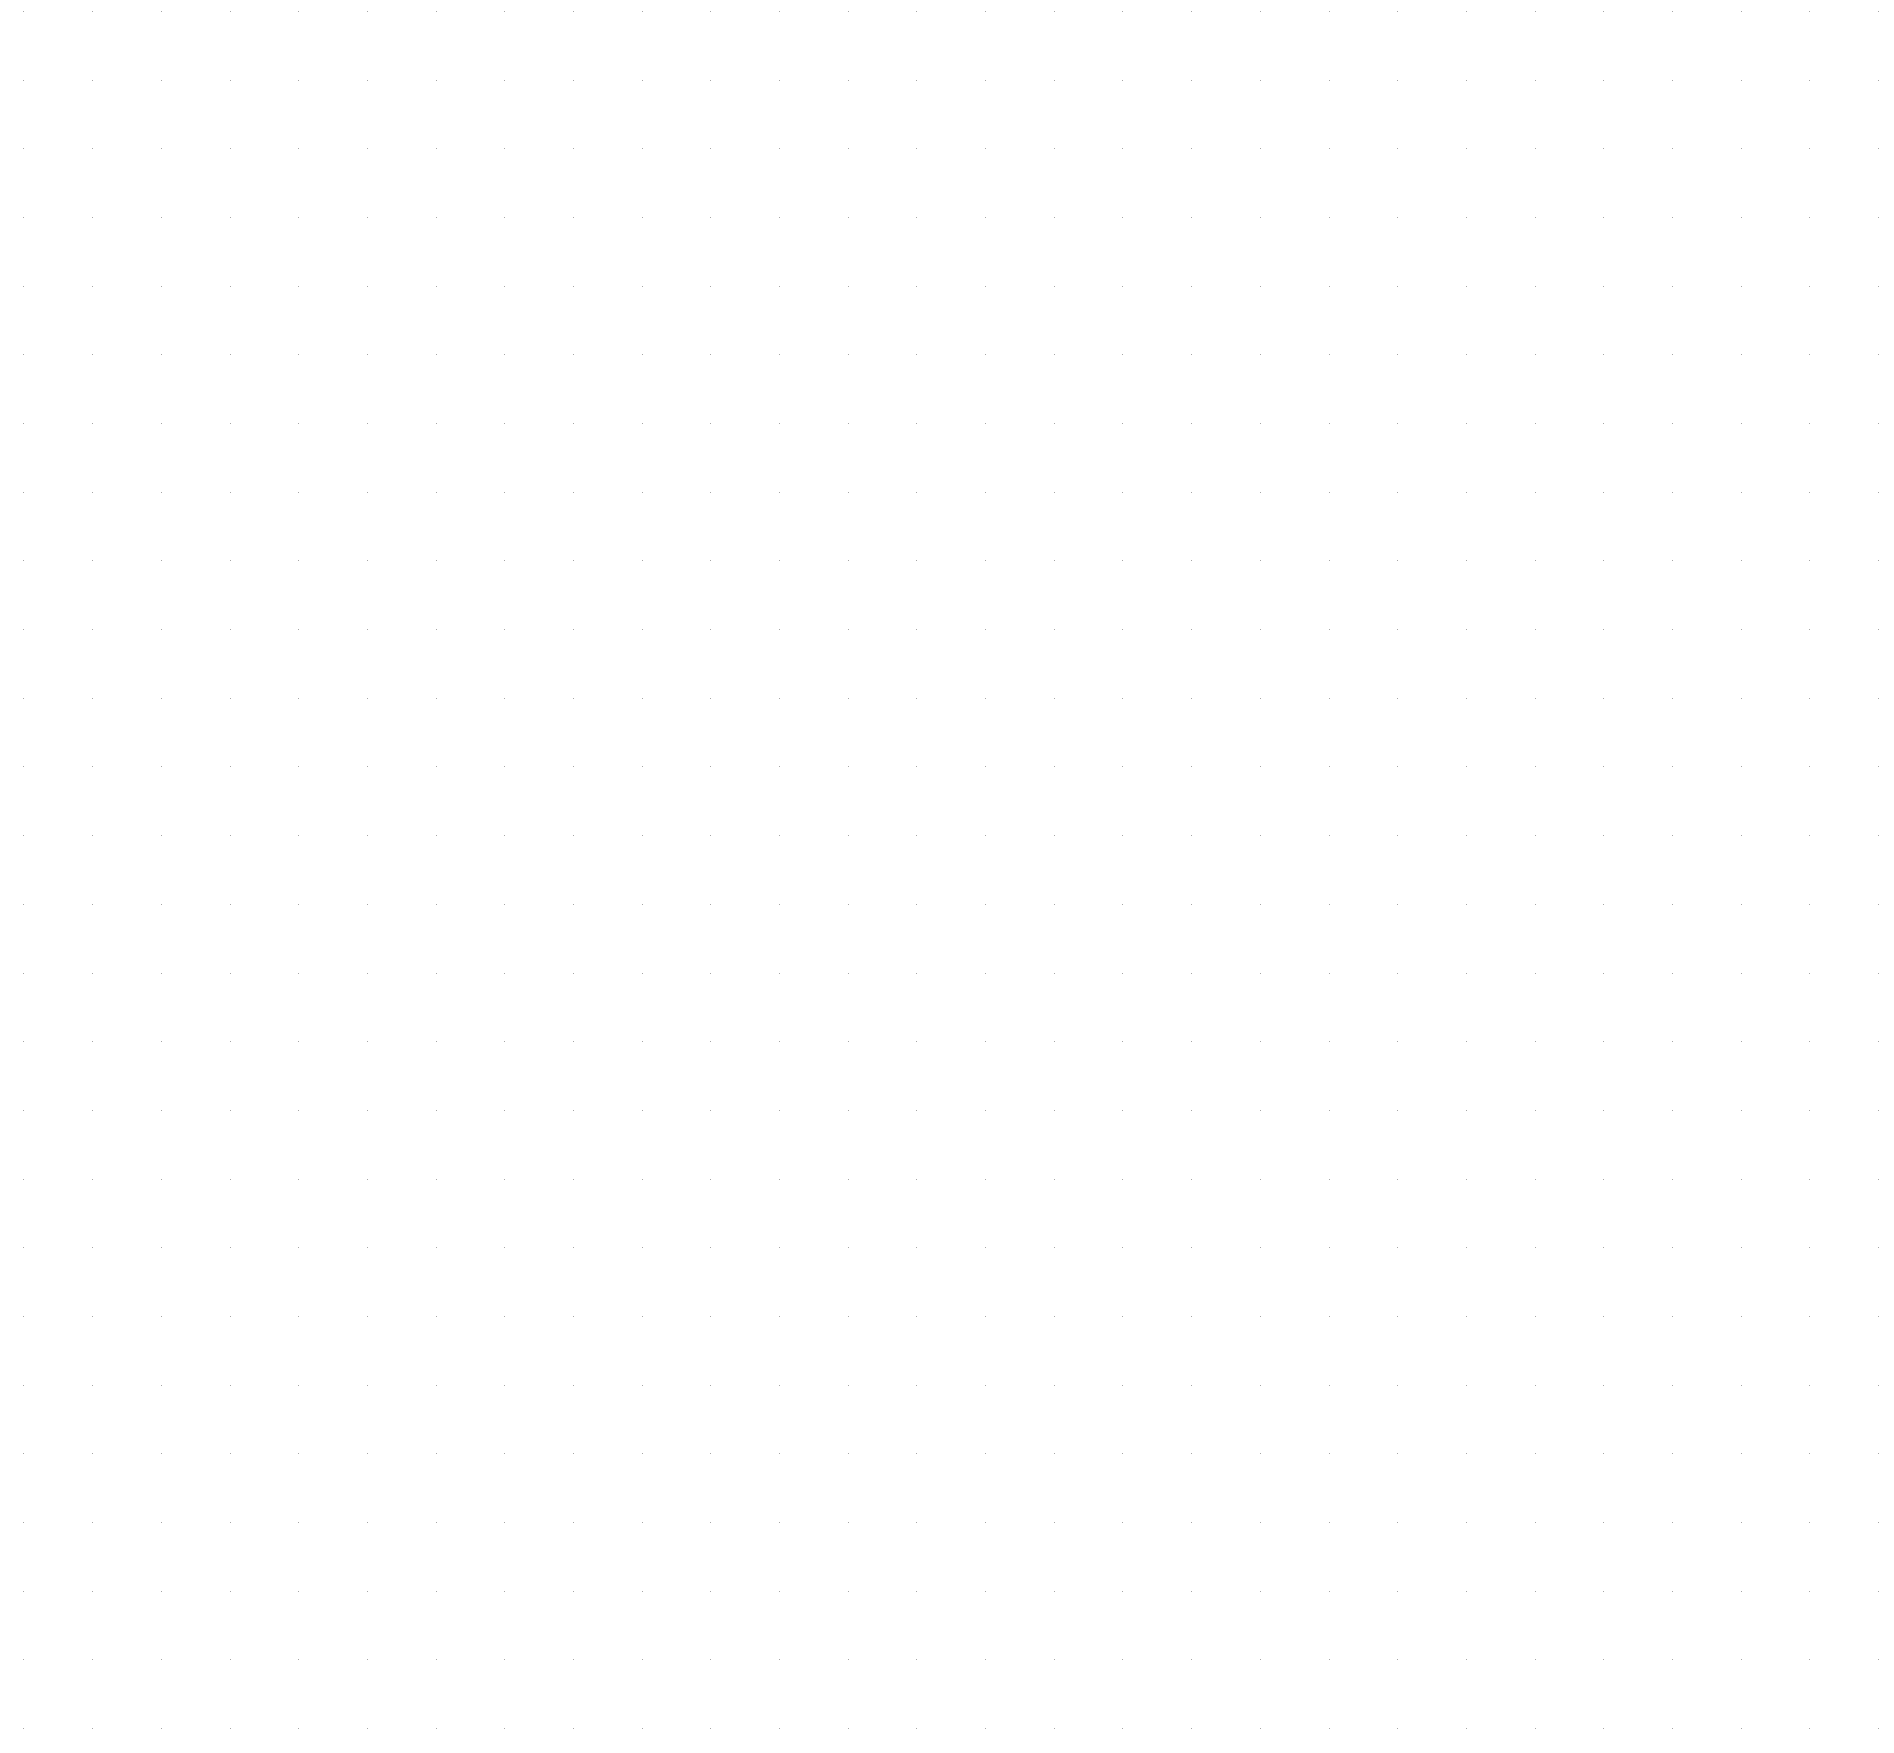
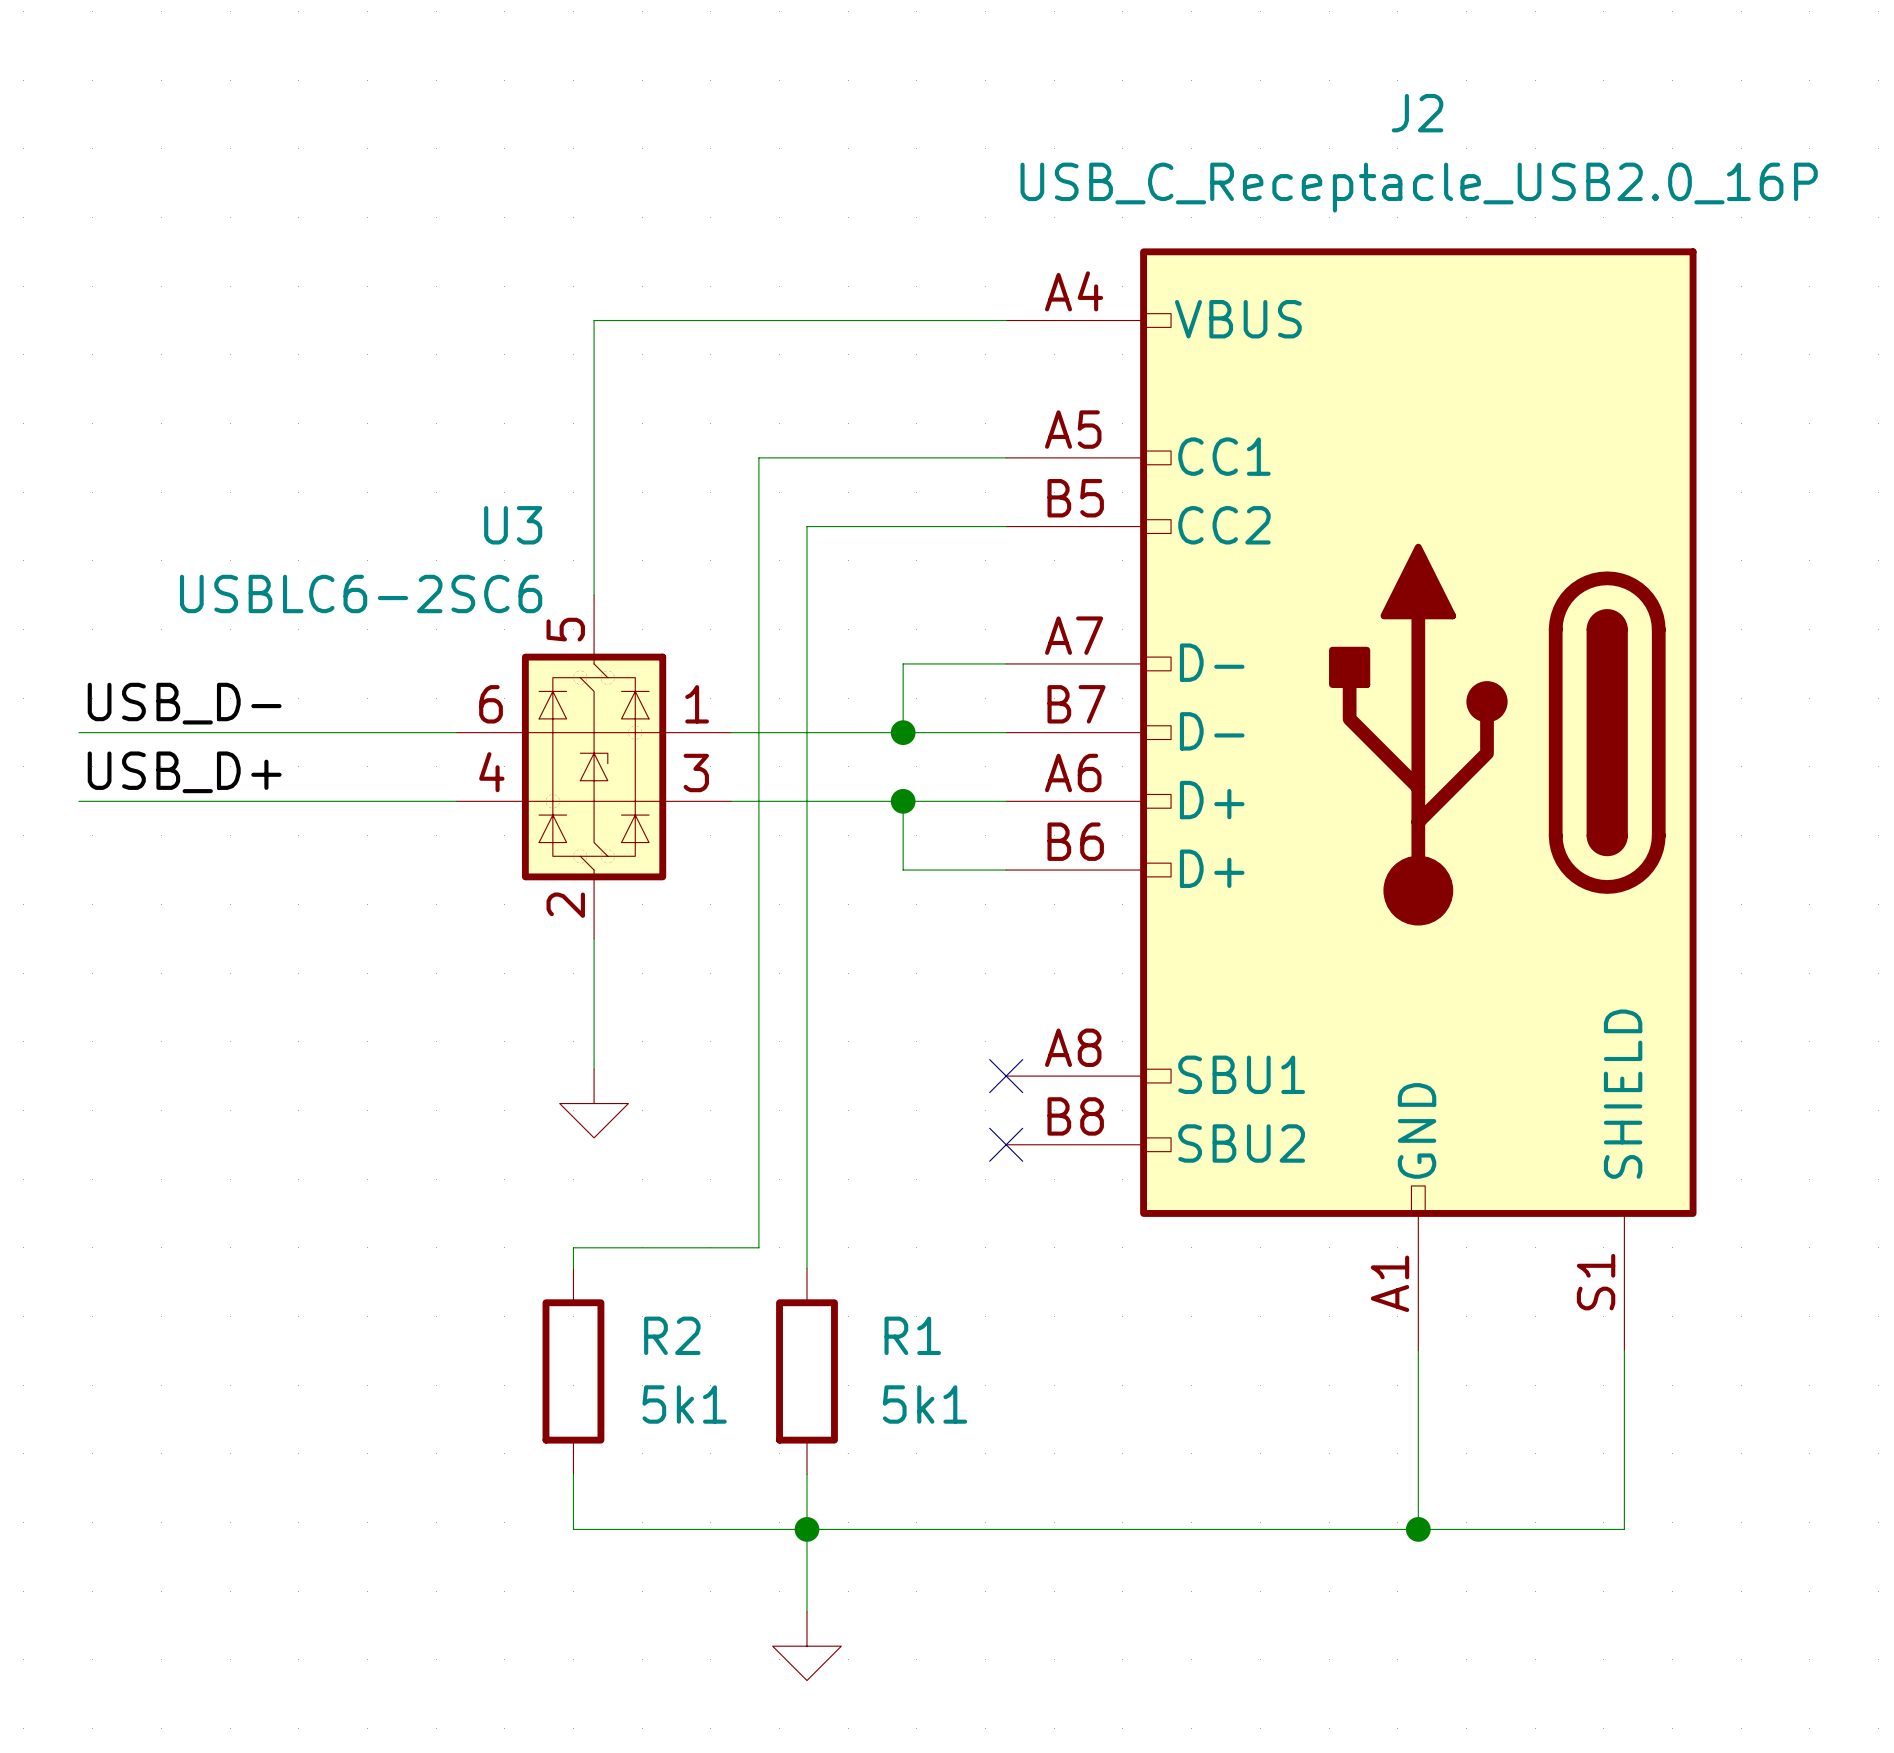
wire: none -> (1006, 320) (594, 320) (594, 595)
wire: none -> (1006, 457) (758, 457) (758, 1247) (573, 1247) (573, 1268)
wire: none -> (1006, 526) (806, 526) (806, 1268)
wire: none -> (1006, 663) (903, 663) (903, 732)
label: none -> USB_D- (184, 703)
wire: none -> (78, 732) (456, 732)
wire: none -> (731, 732) (1006, 732)
junction: none -> (903, 732)
U3: none -> USBLC6-2SC6 (594, 766)
label: none -> USB_D+ (184, 772)
J2: none -> USB_C_Receptacle_USB2.0_16P (1351, 799)
wire: none -> (78, 801) (456, 801)
wire: none -> (731, 801) (1006, 801)
wire: none -> (903, 801) (903, 870) (1006, 870)
junction: none -> (903, 801)
wire: none -> (594, 938) (594, 1069)
no-connect mark: none -> (1006, 1076)
power symbol: none -> (594, 1103)
no-connect mark: none -> (1006, 1144)
wire: none -> (1418, 1350) (1418, 1529)
wire: none -> (1624, 1350) (1624, 1529) (573, 1529) (573, 1474)
R2: none -> 5k1 (573, 1371)
R1: none -> 5k1 (806, 1371)
wire: none -> (806, 1474) (806, 1611)
junction: none -> (806, 1529)
junction: none -> (1418, 1529)
power symbol: none -> (806, 1646)

